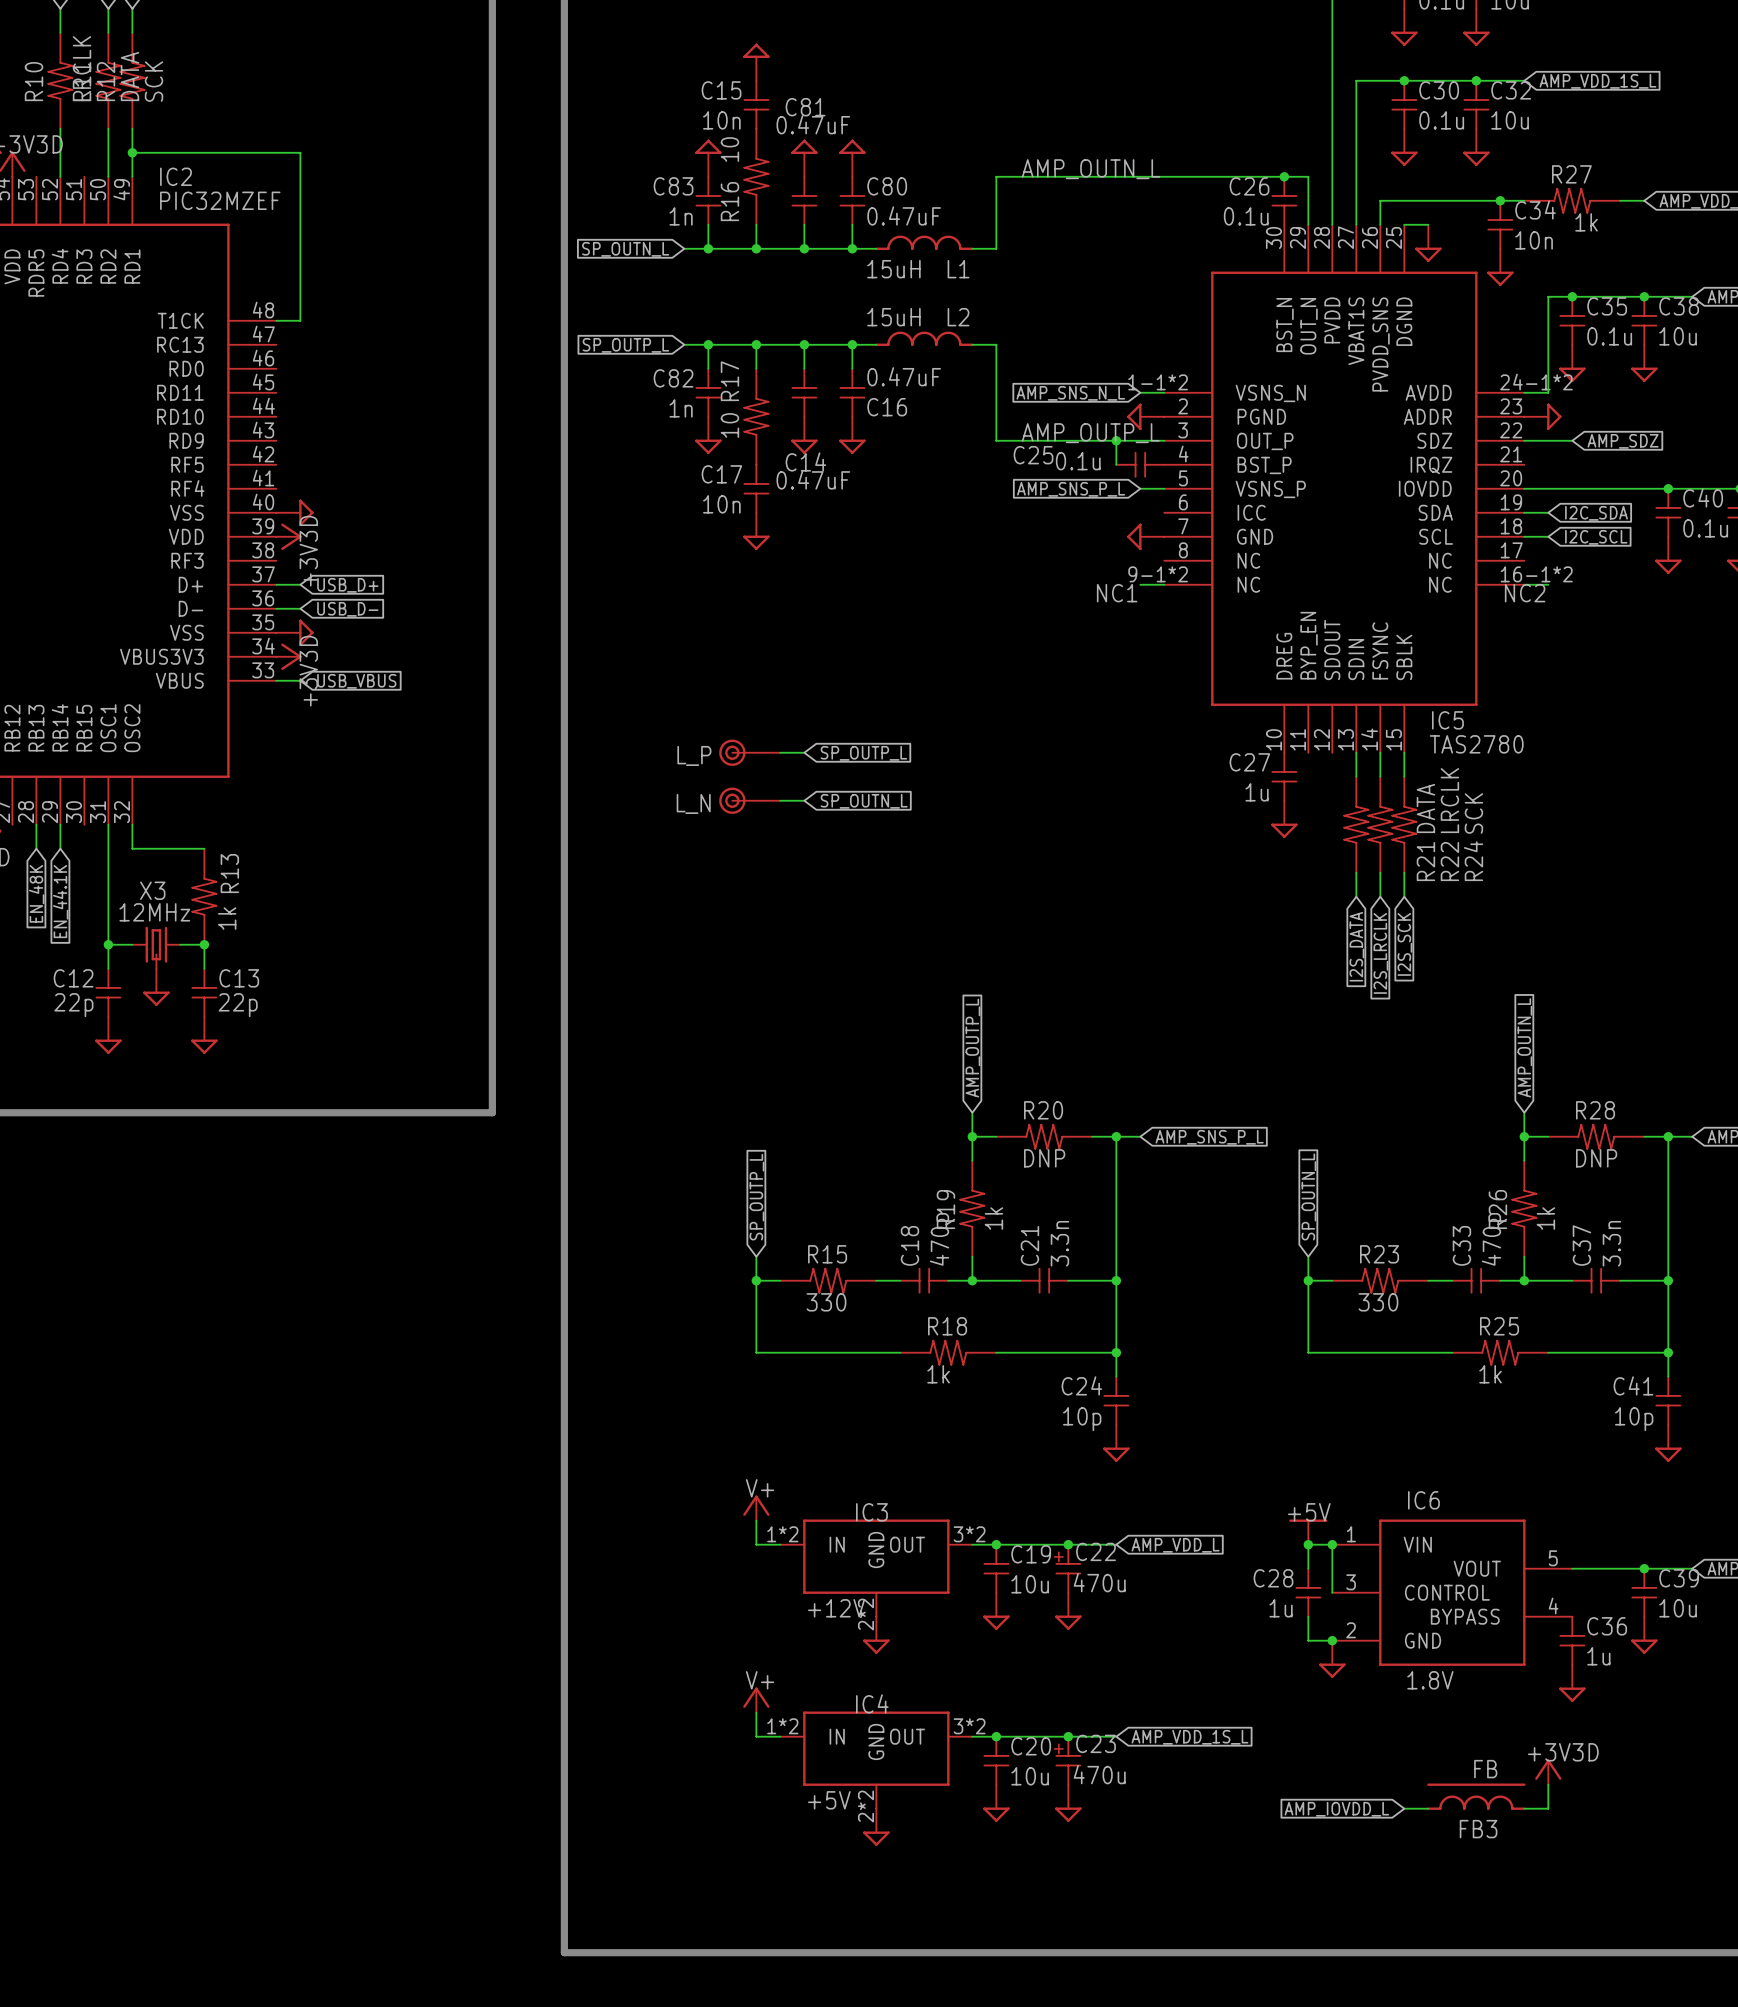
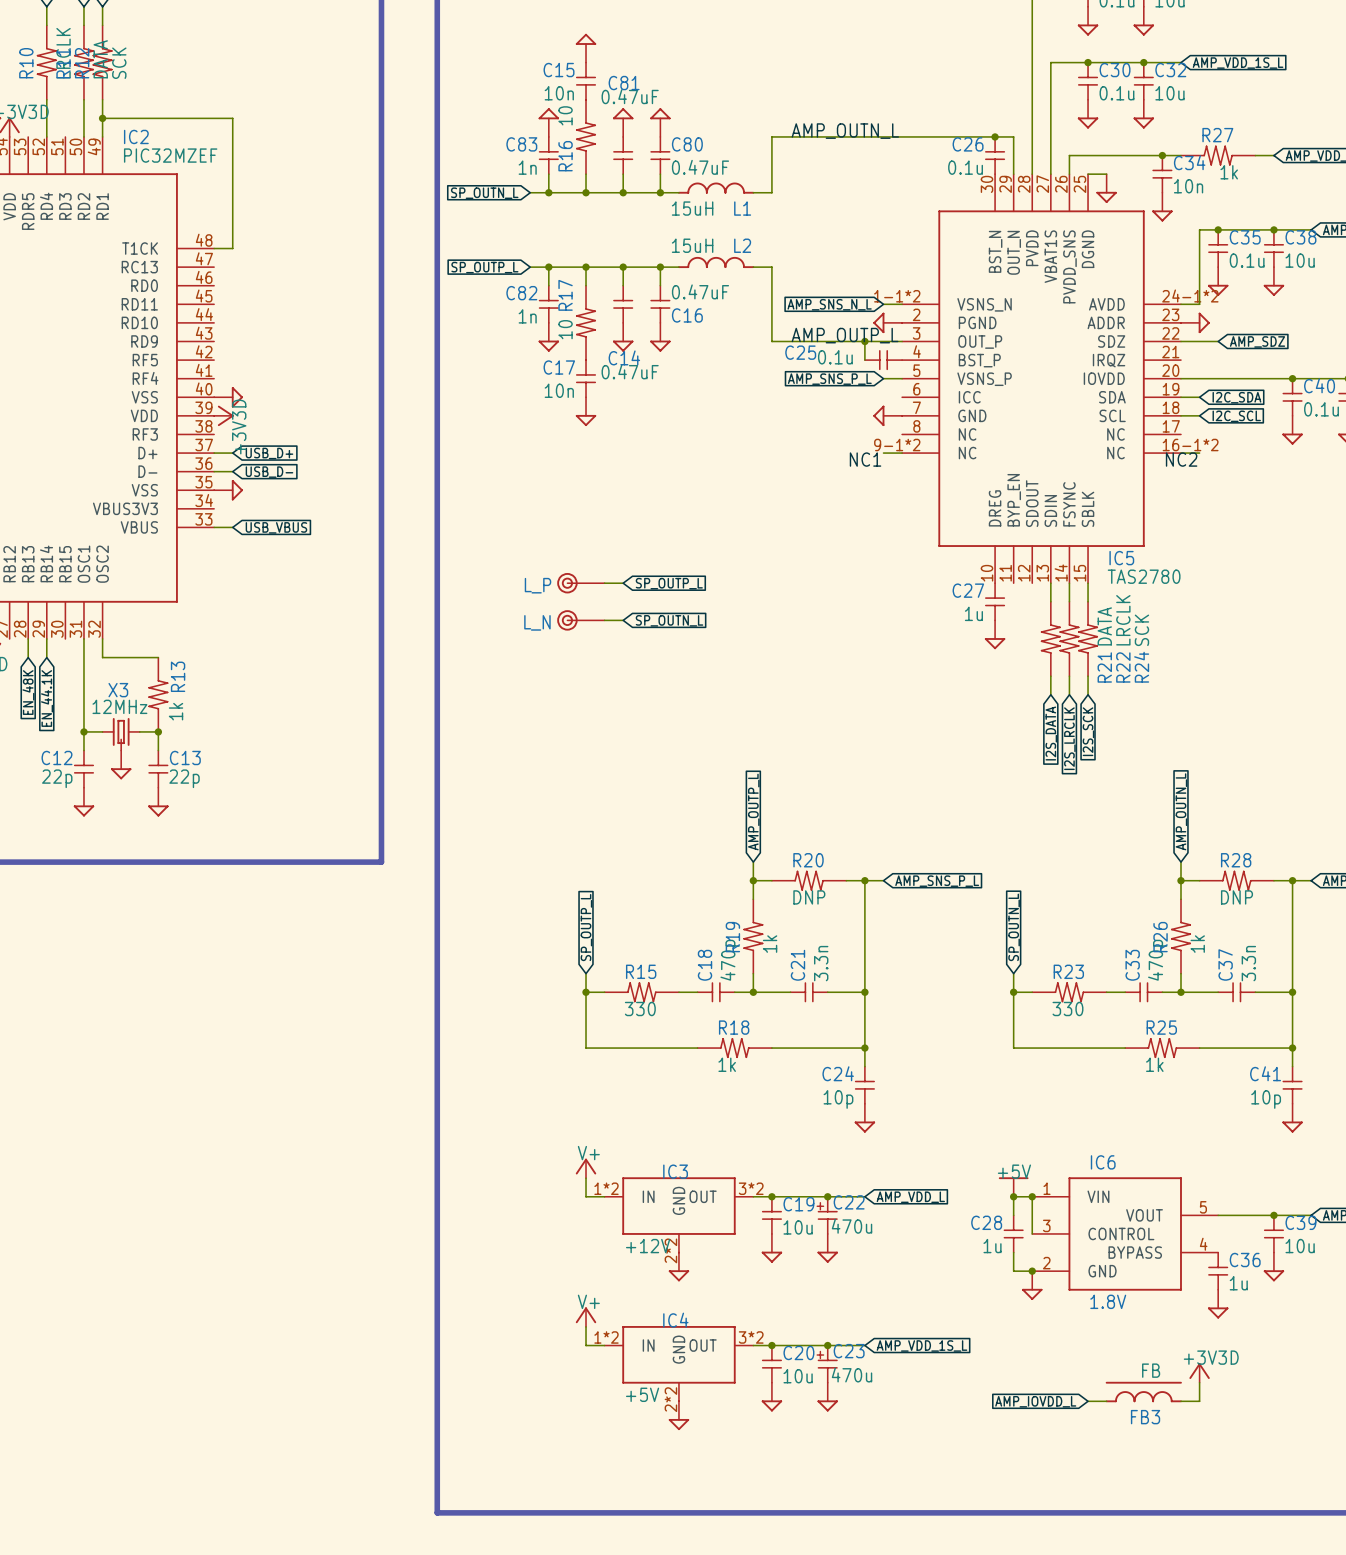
power symbol: +3V3D (288, 656) -> none

